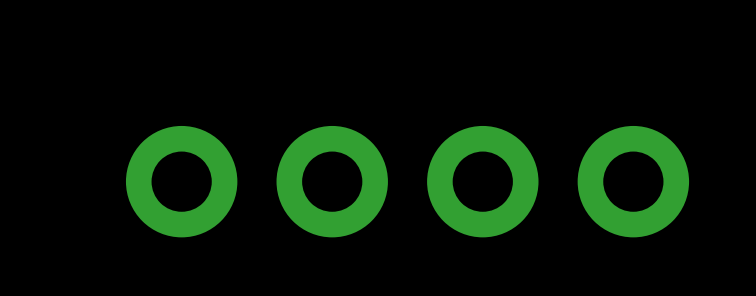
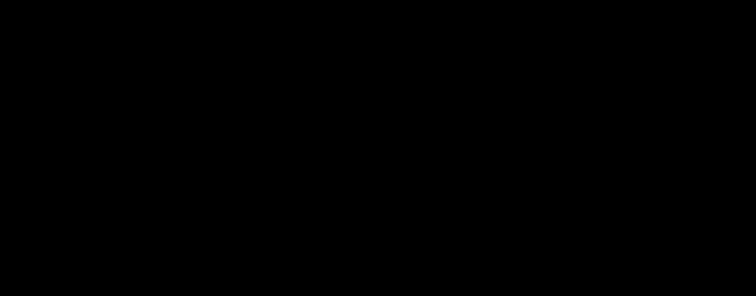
part: (407, 181) -> none

